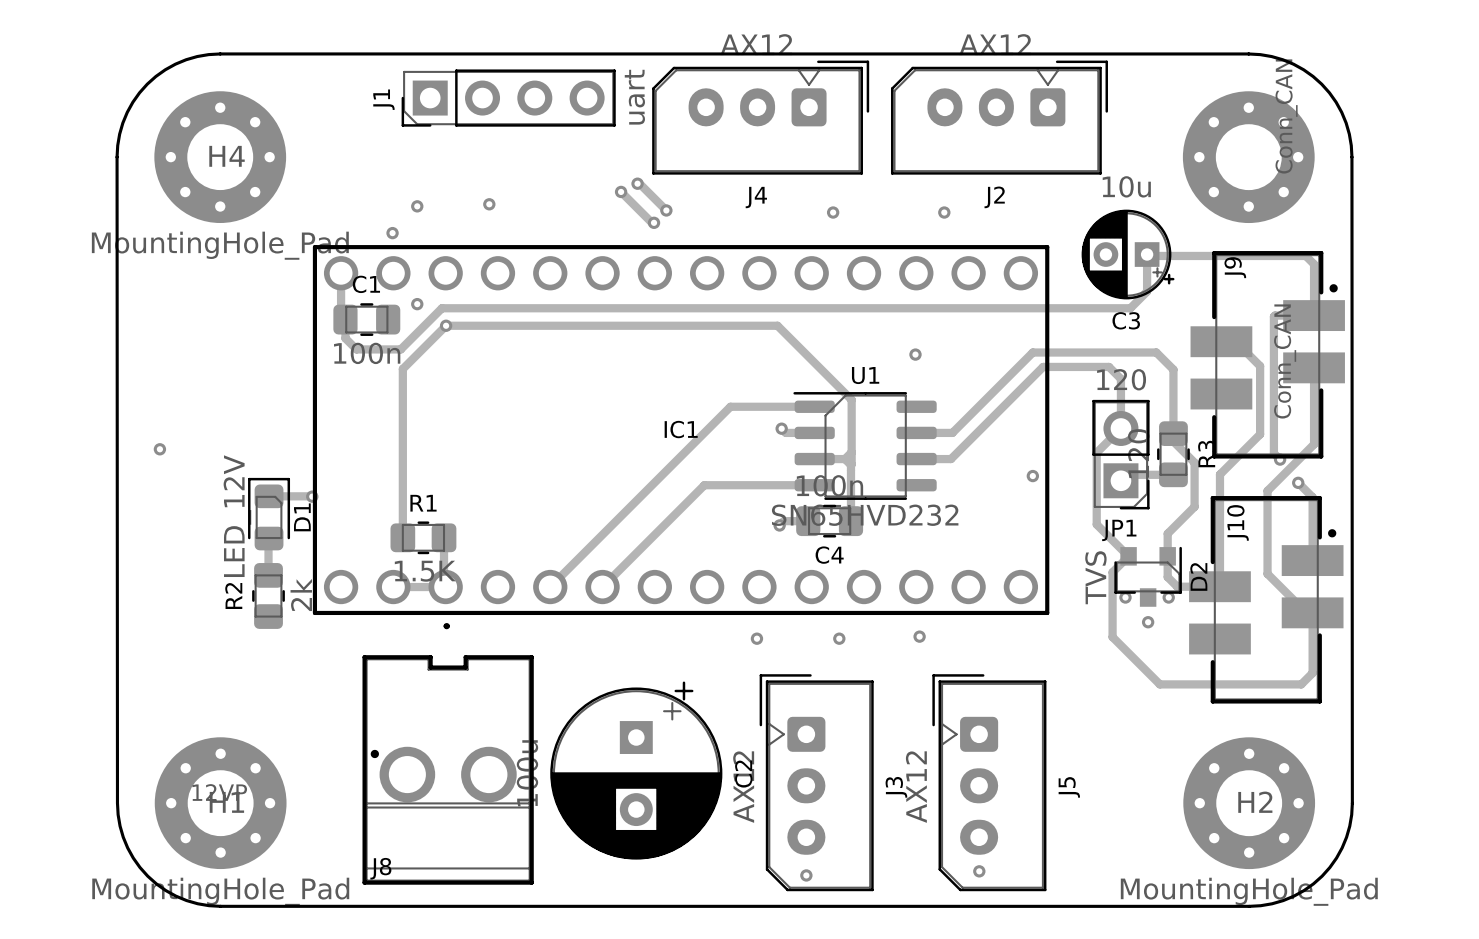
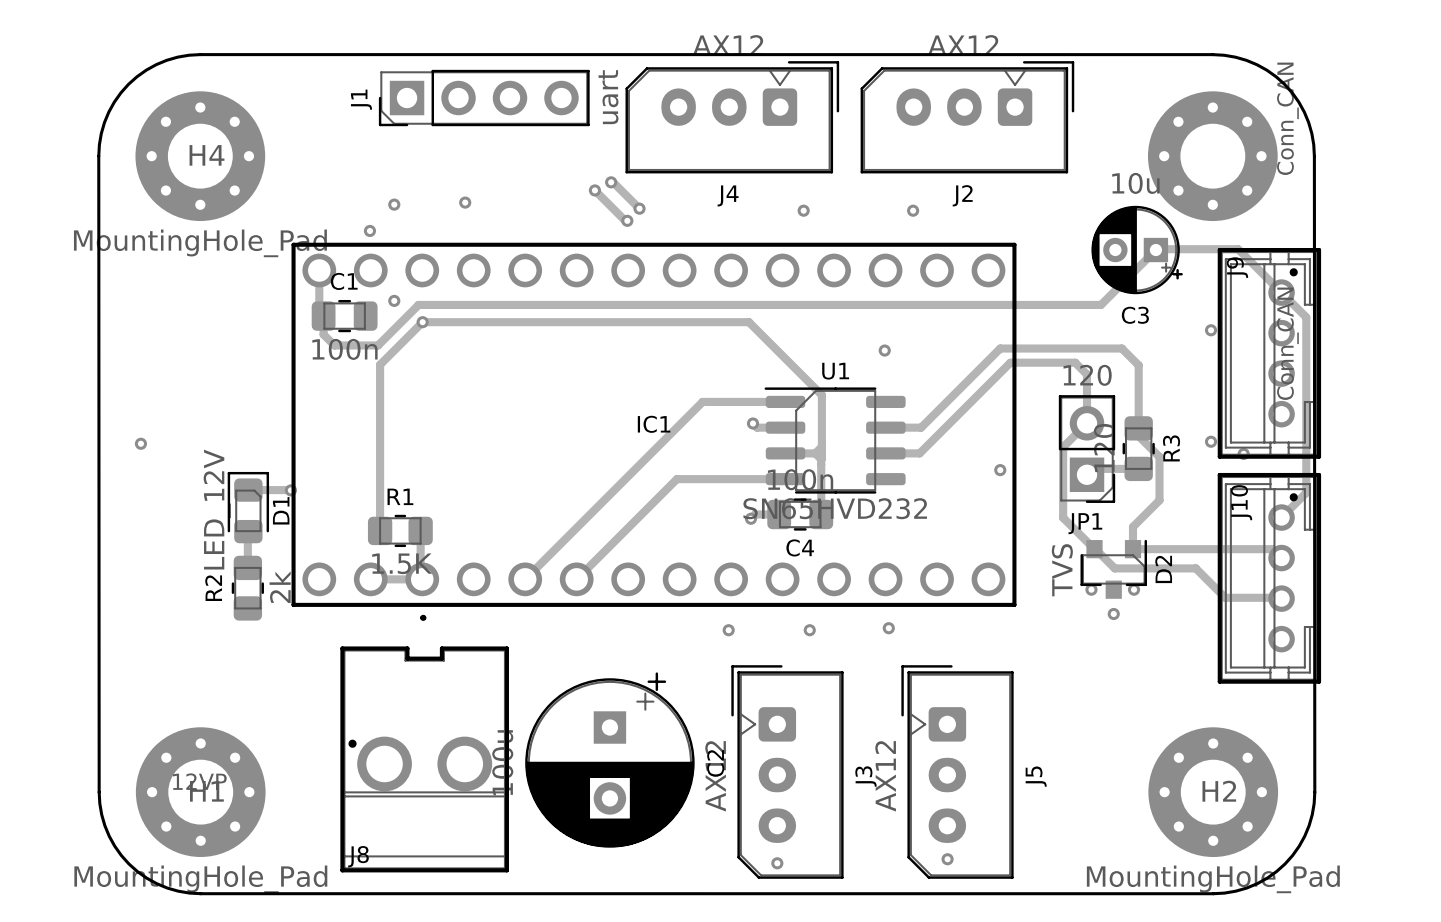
J9 footprint: [1190, 251, 1345, 459] -> [1217, 247, 1322, 459]
C3 position: (1128, 254) -> (1137, 250)
track: (1130, 308) (1147, 291) (1147, 254) (1305, 255) (1314, 264) (1314, 315) (1273, 316) (1273, 453) (1280, 459) -> (1096, 304) (1100, 304) (1156, 249) (1238, 249) (1306, 317) (1306, 492) (1281, 517)
via: none -> (1211, 330)
track: (1221, 341) (1235, 341) (1260, 366) (1260, 434) (1219, 474) (1219, 586) (1177, 586) (1167, 577) (1167, 556) -> (1281, 558) (1272, 549) (1133, 549)
track: (1314, 367) (1314, 444) (1267, 490) (1267, 573) (1306, 612) (1312, 612) (1312, 673) (1301, 684) (1159, 684) (1112, 637) (1112, 572) (1128, 556) -> (1281, 598) (1225, 597) (1195, 568) (1114, 568) (1094, 549)
track: (1298, 482) (1312, 497) (1312, 560) -> none
via position: (1298, 482) -> (1211, 441)
J10 footprint: [1189, 496, 1344, 704] -> [1217, 472, 1322, 684]

